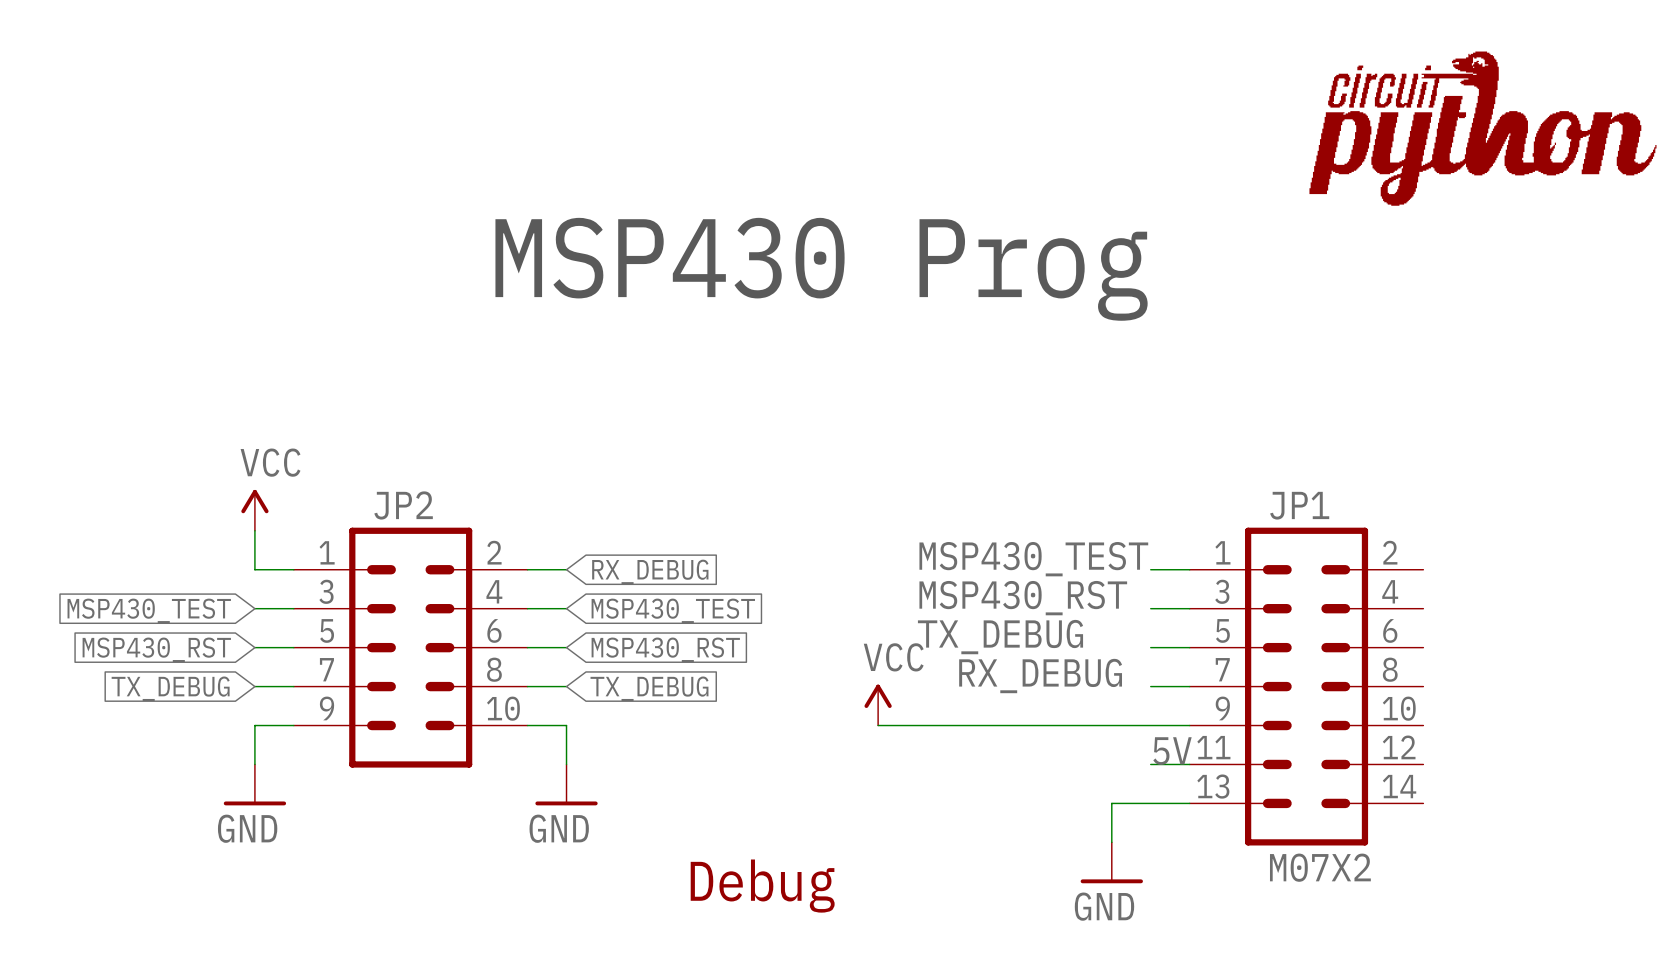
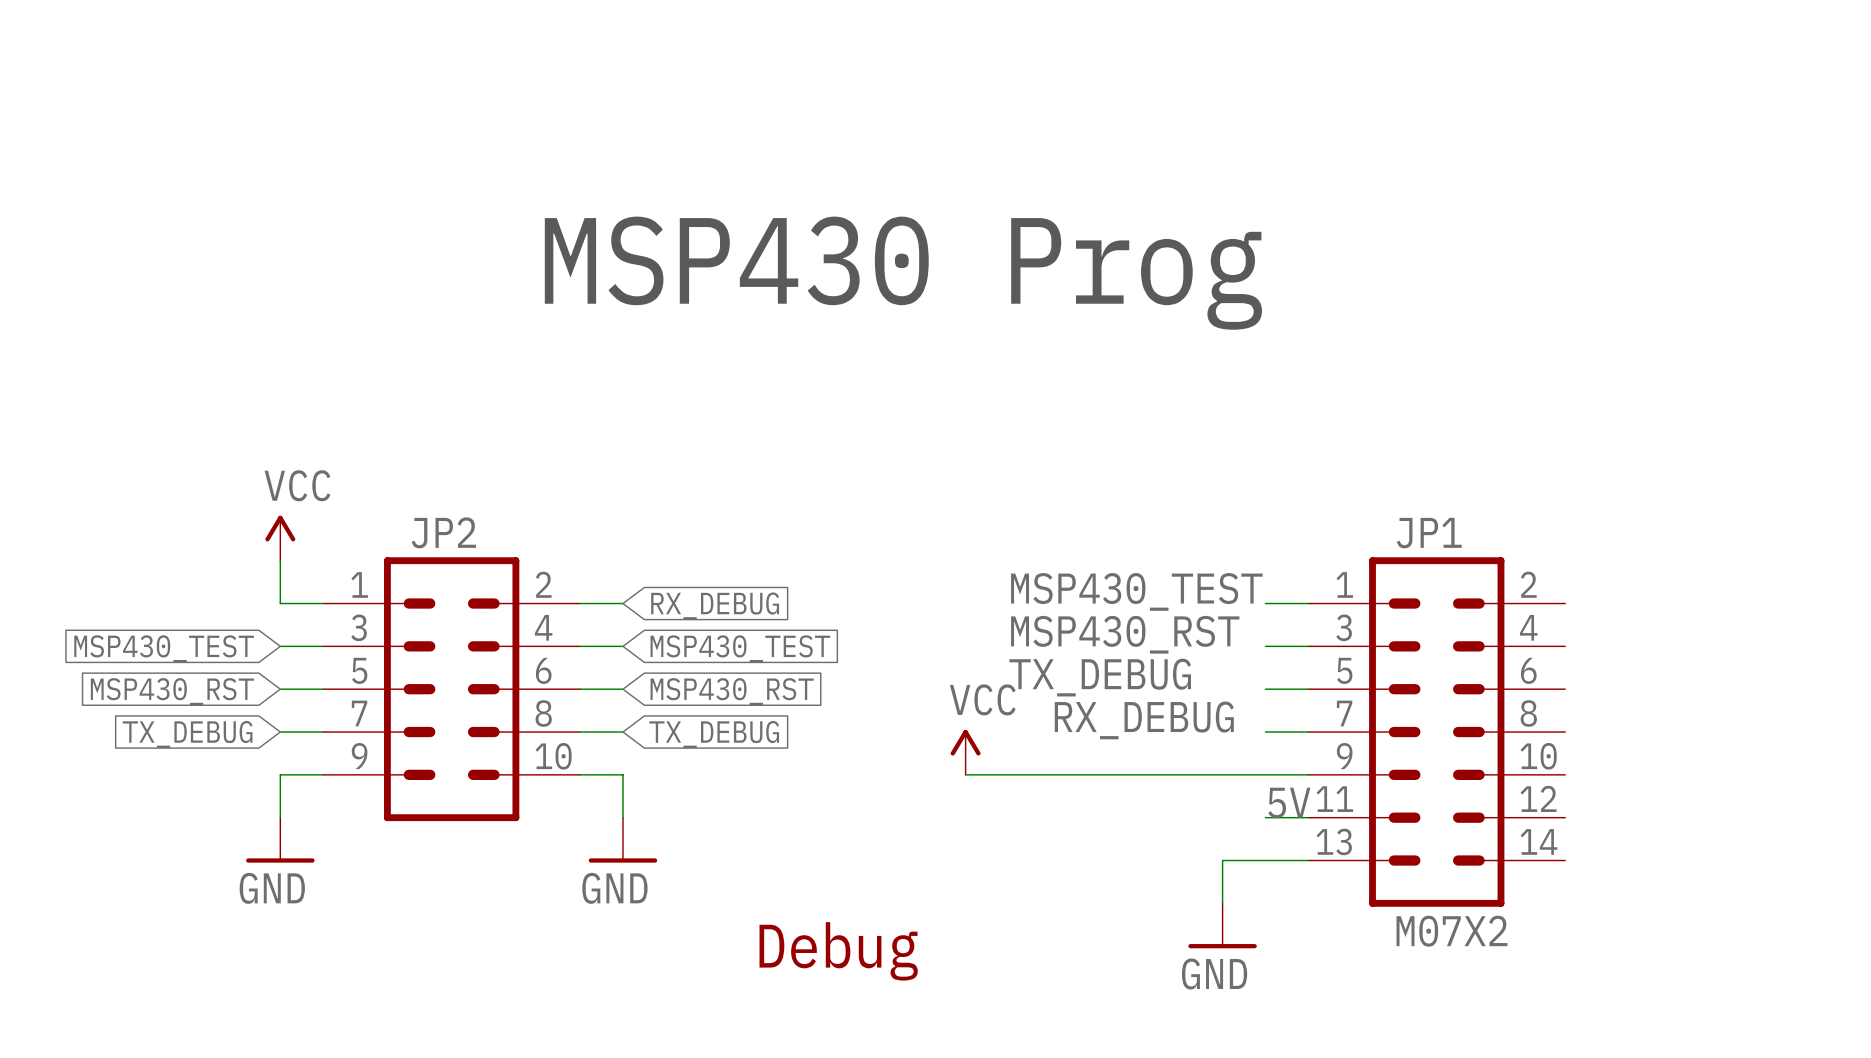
part: (1482, 128) -> none

